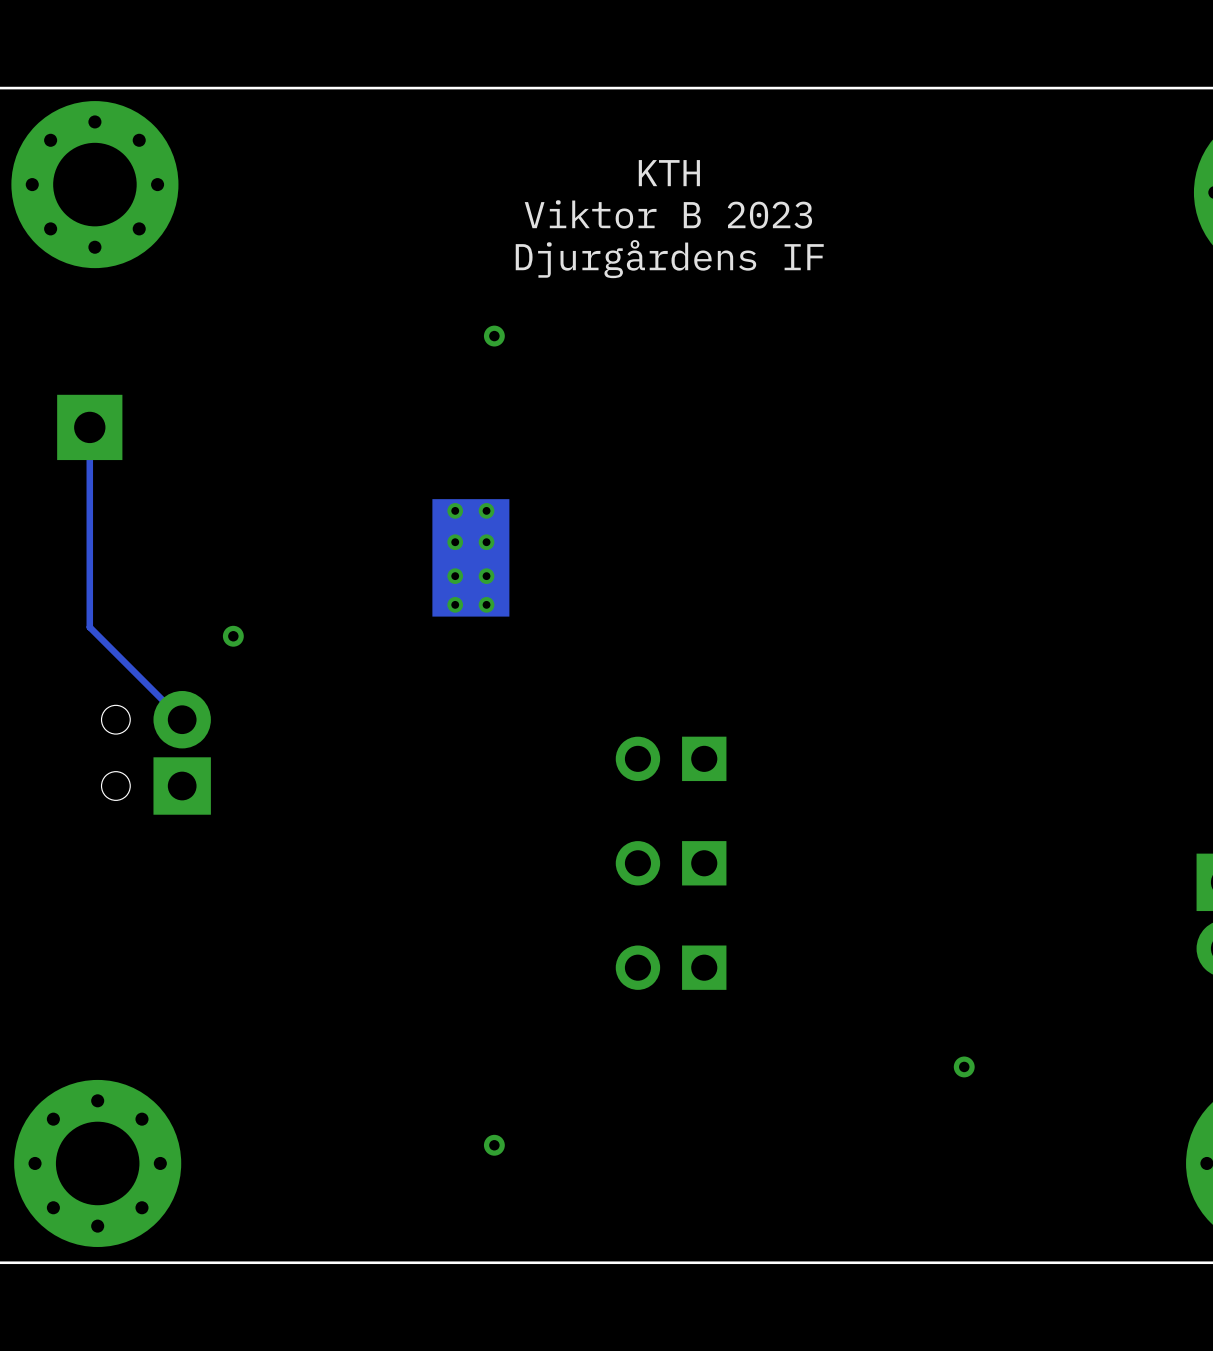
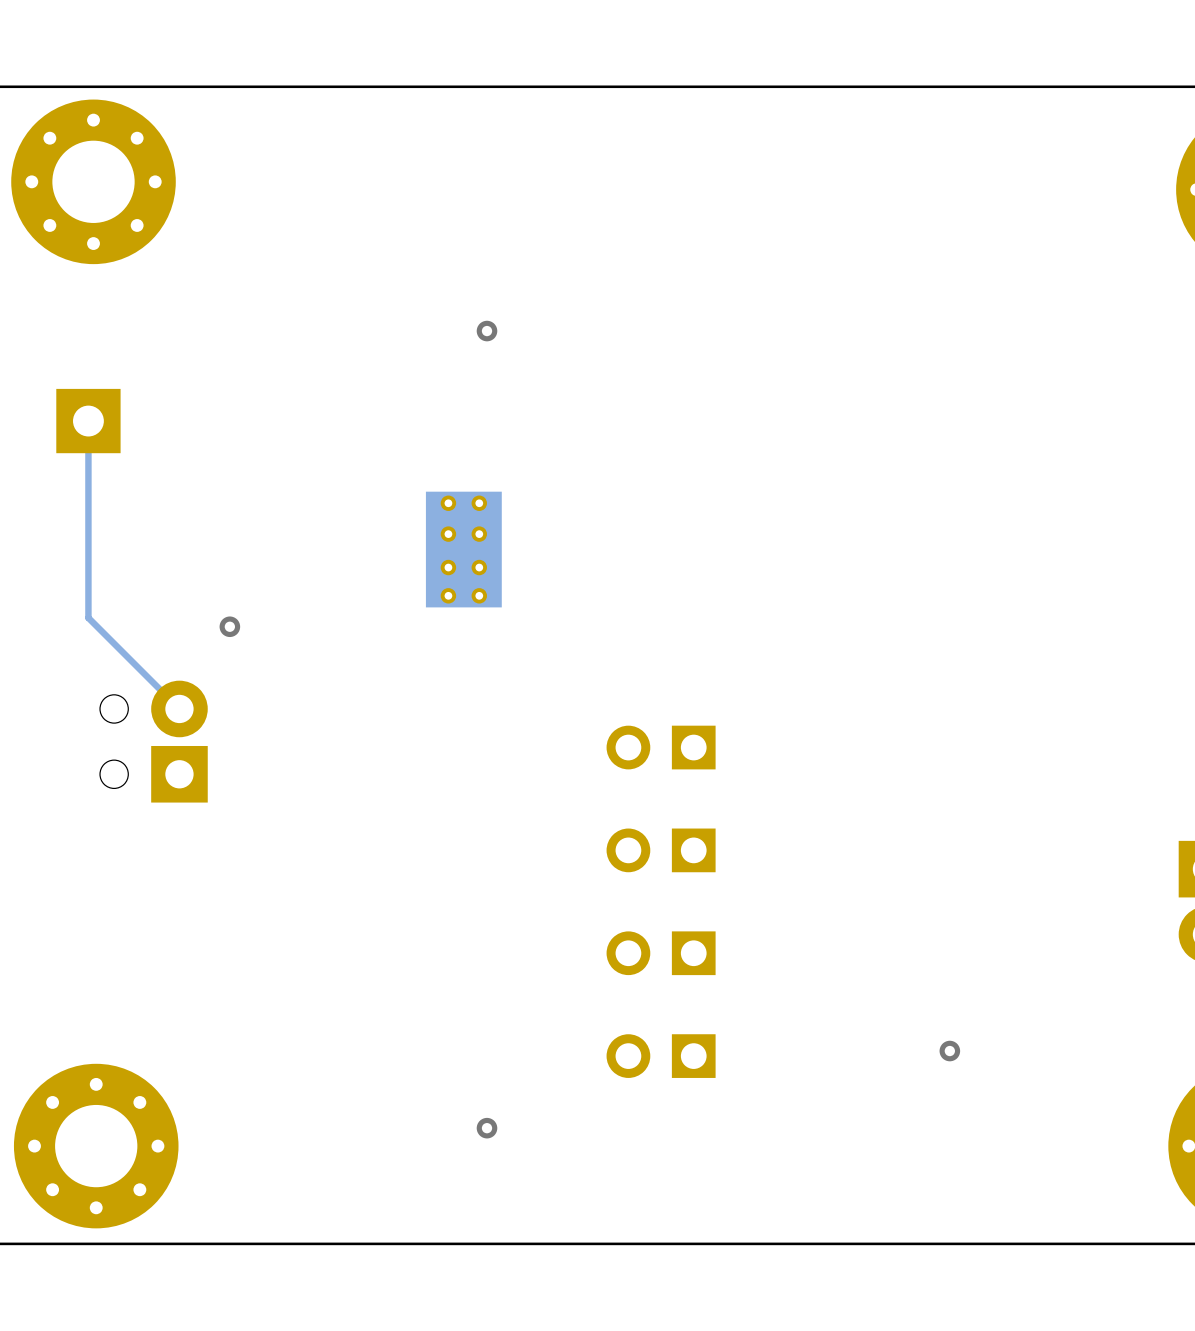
text: KTH (669, 173) -> none
text: Viktor B 2023 (668, 214) -> none
text: Djurgårdens IF (669, 259) -> none
part: none -> (661, 1056)

